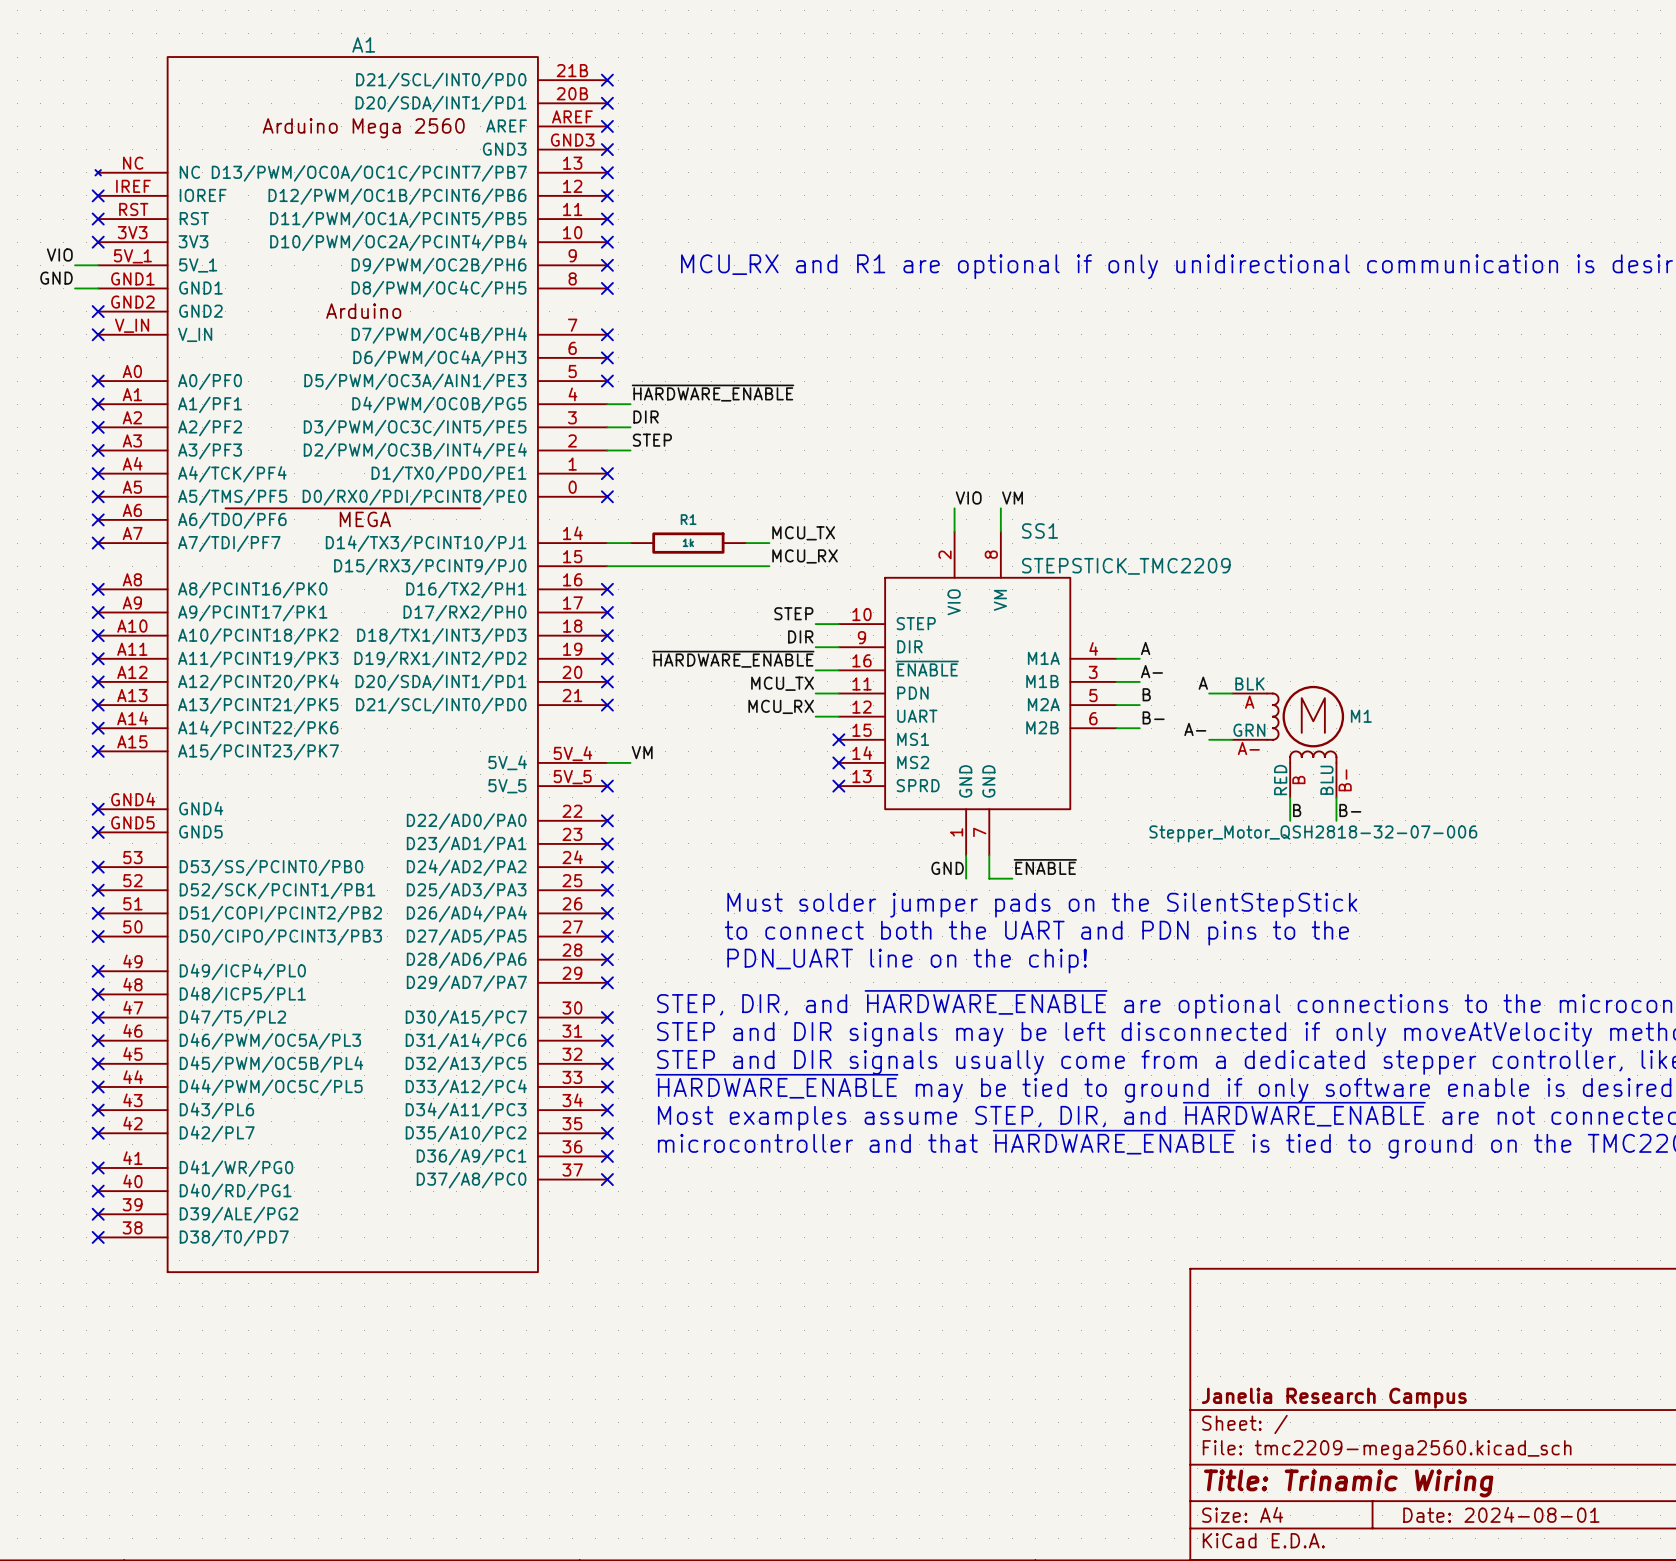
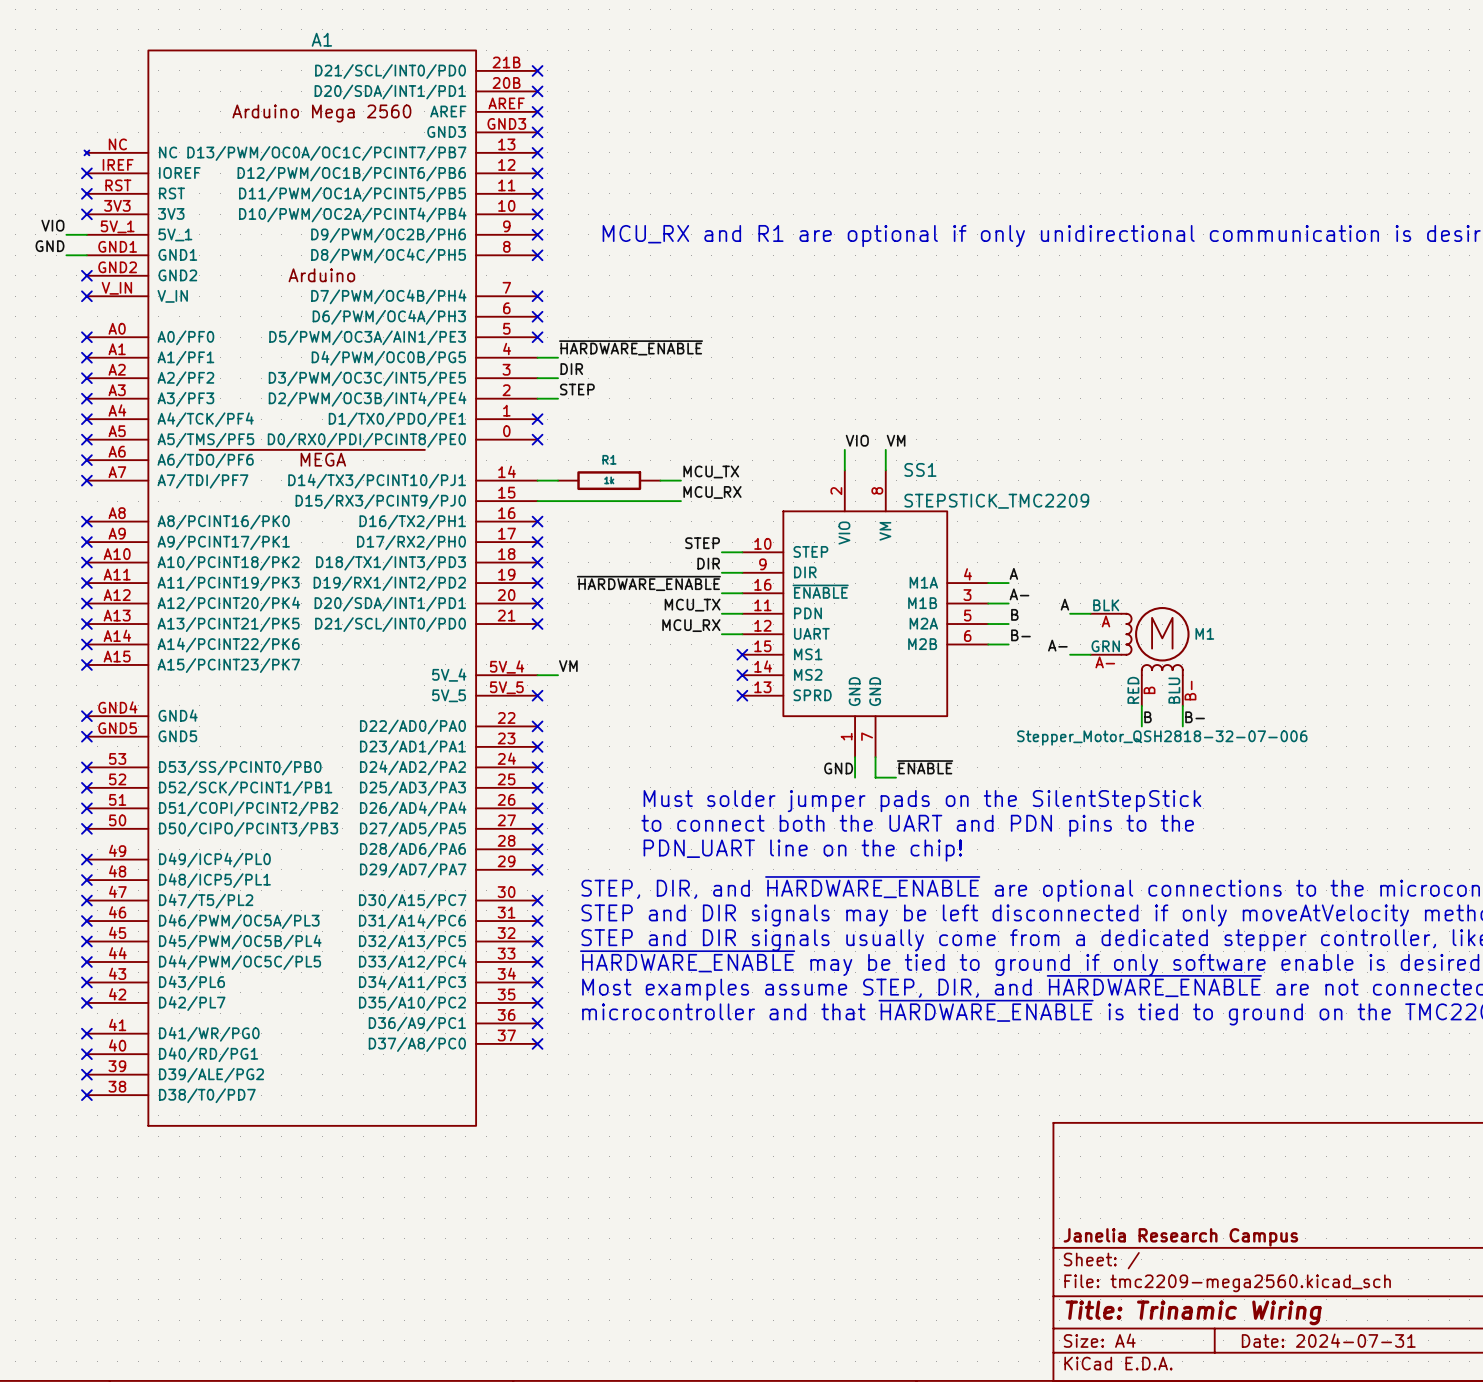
title block: Date: 2024-08-01 (1501, 1514) -> Date: 2024-07-31 (1328, 1340)

